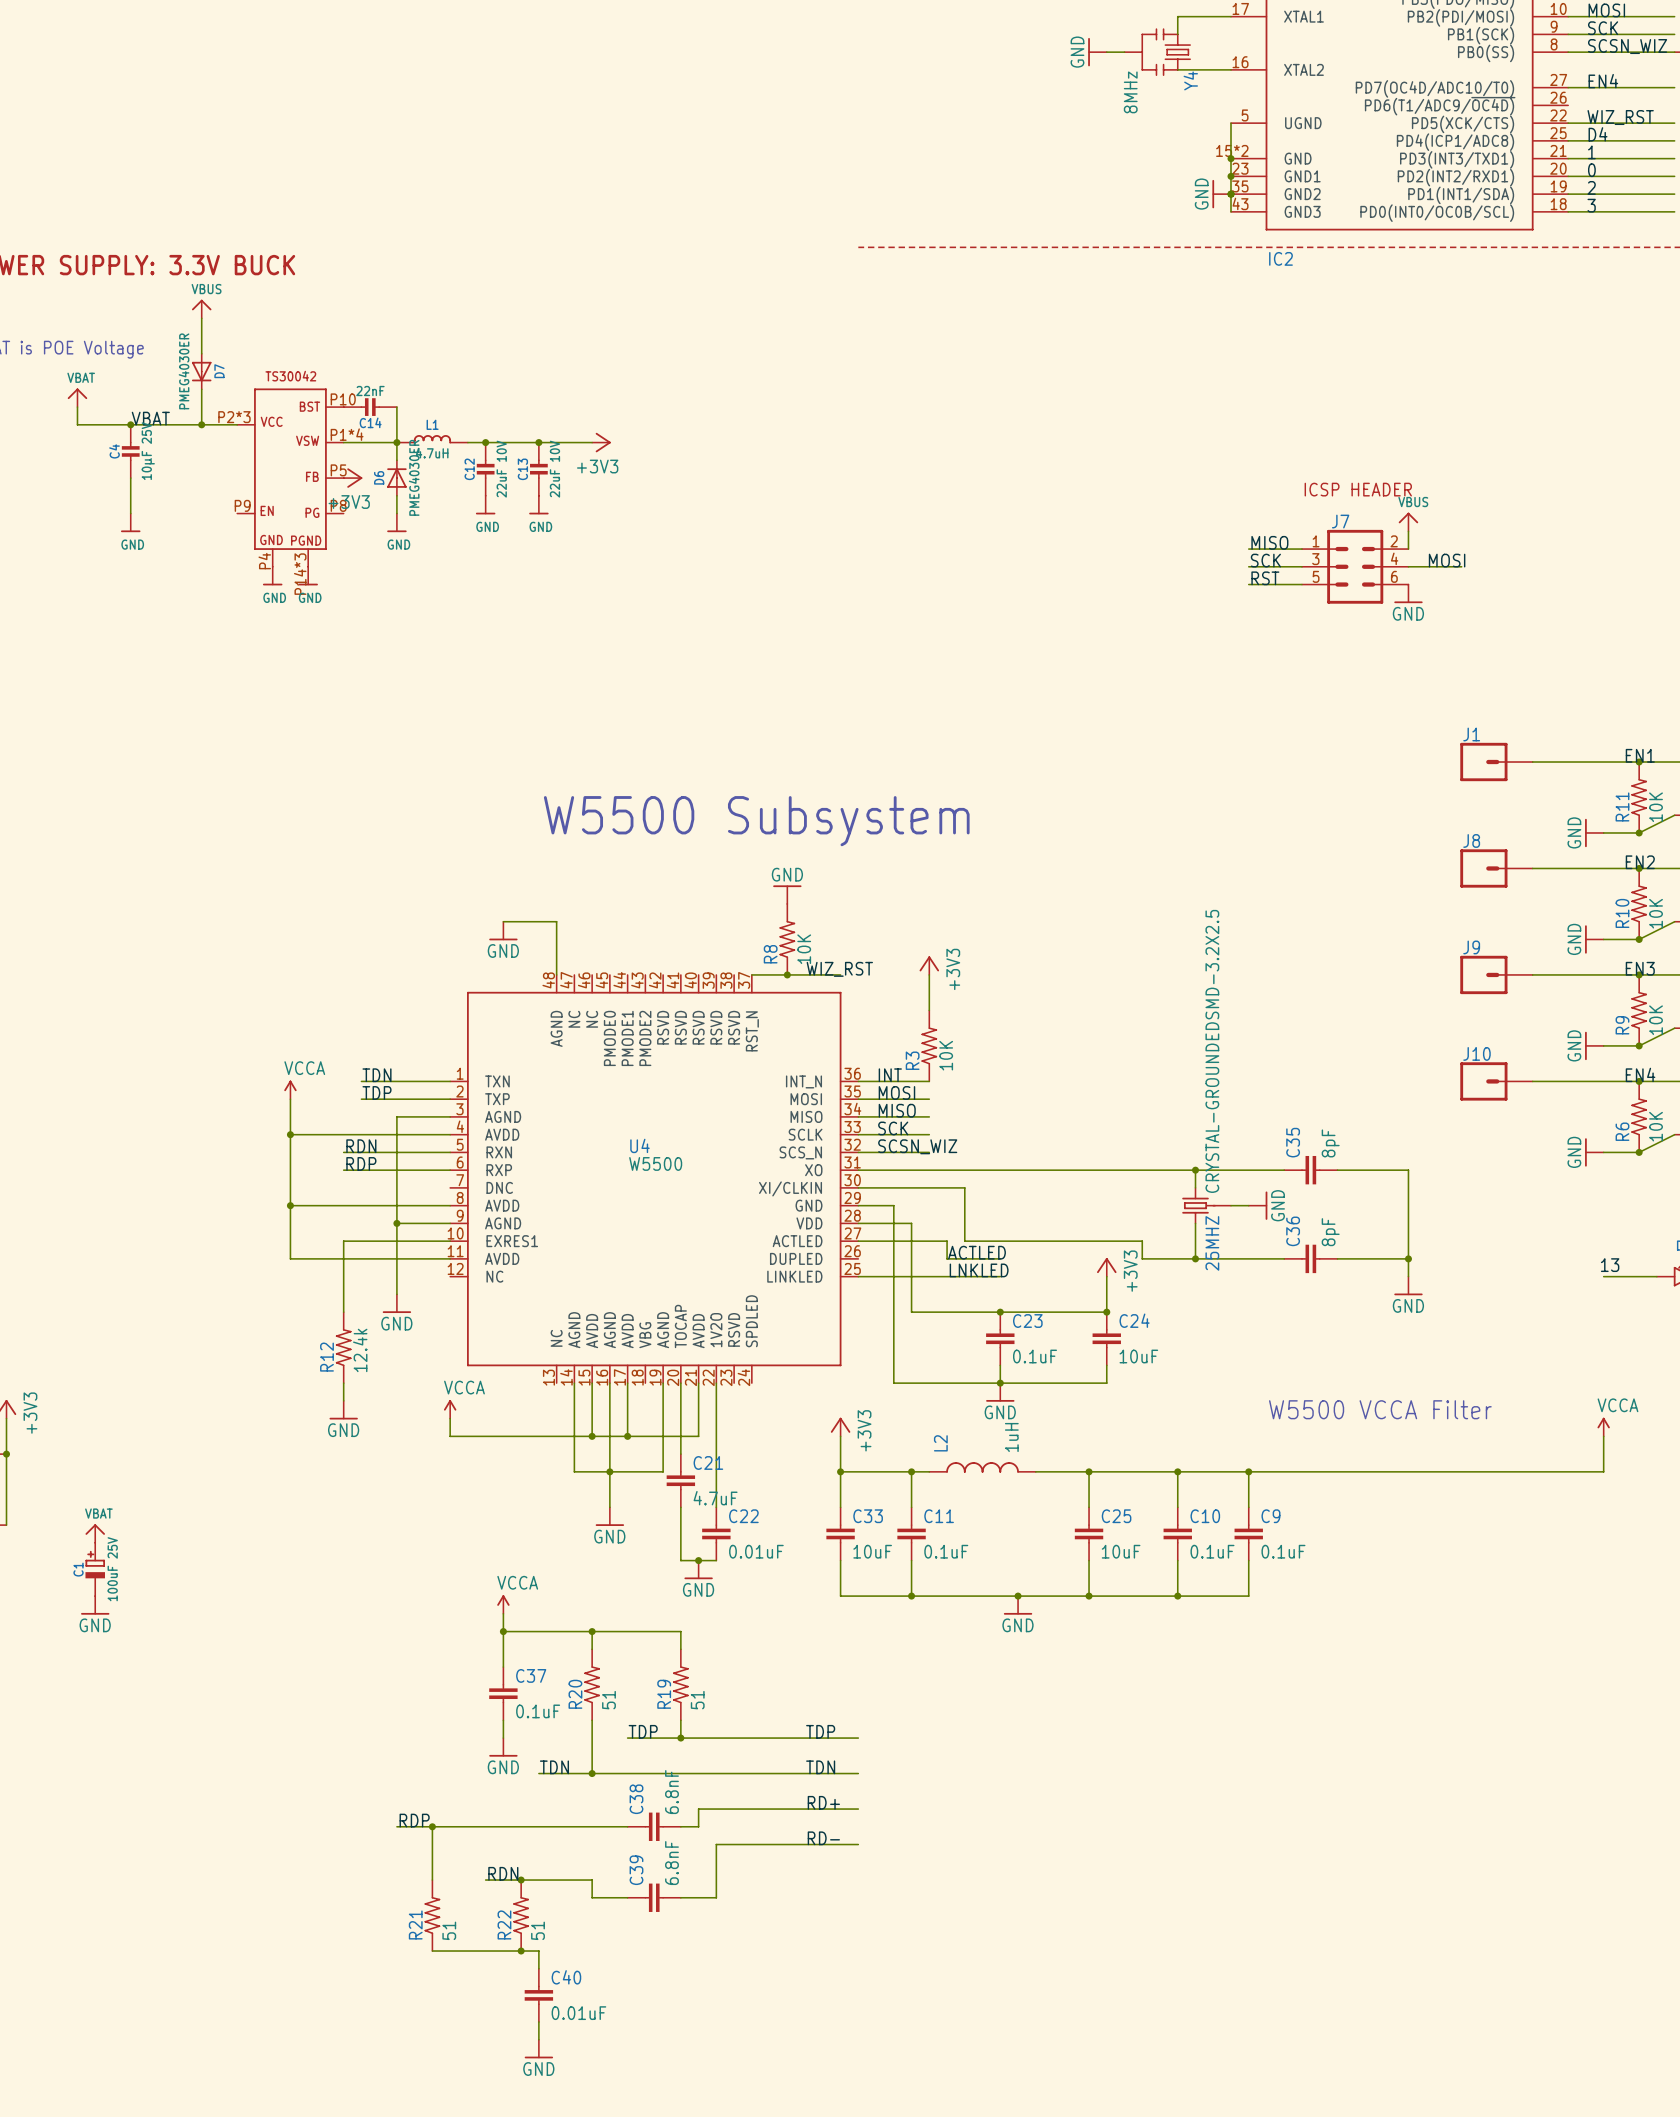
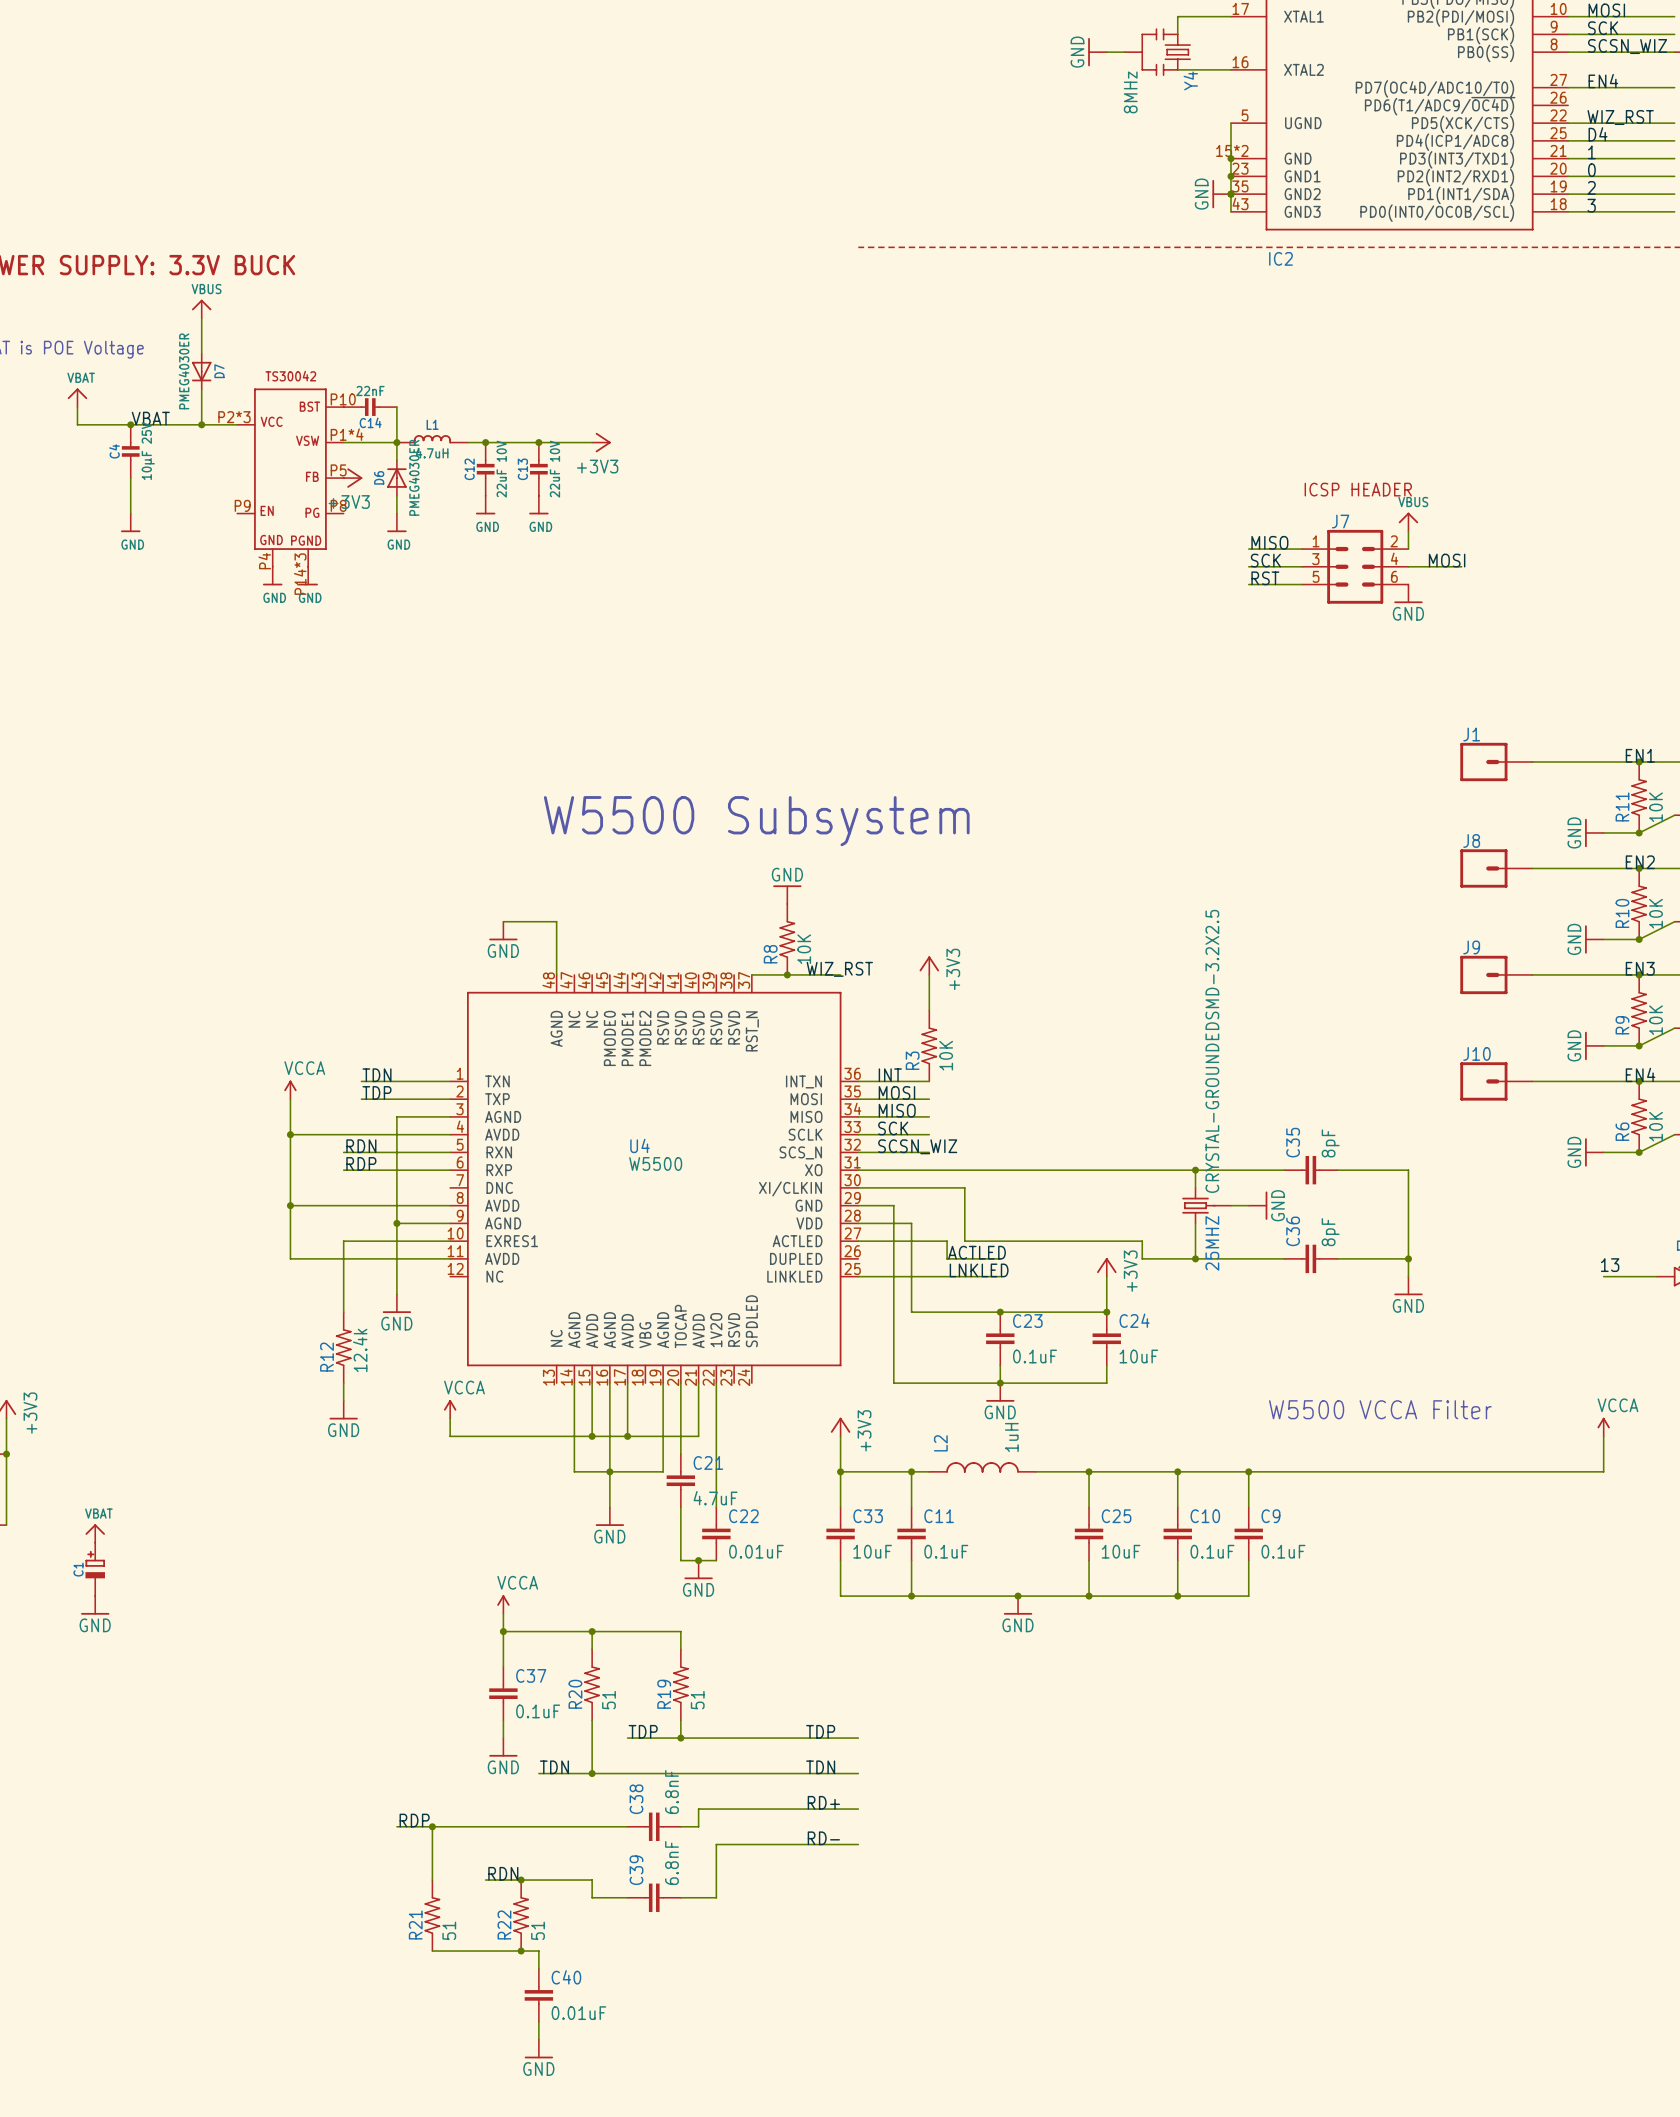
C1 value: 100uF 25V (112, 1569) -> none

